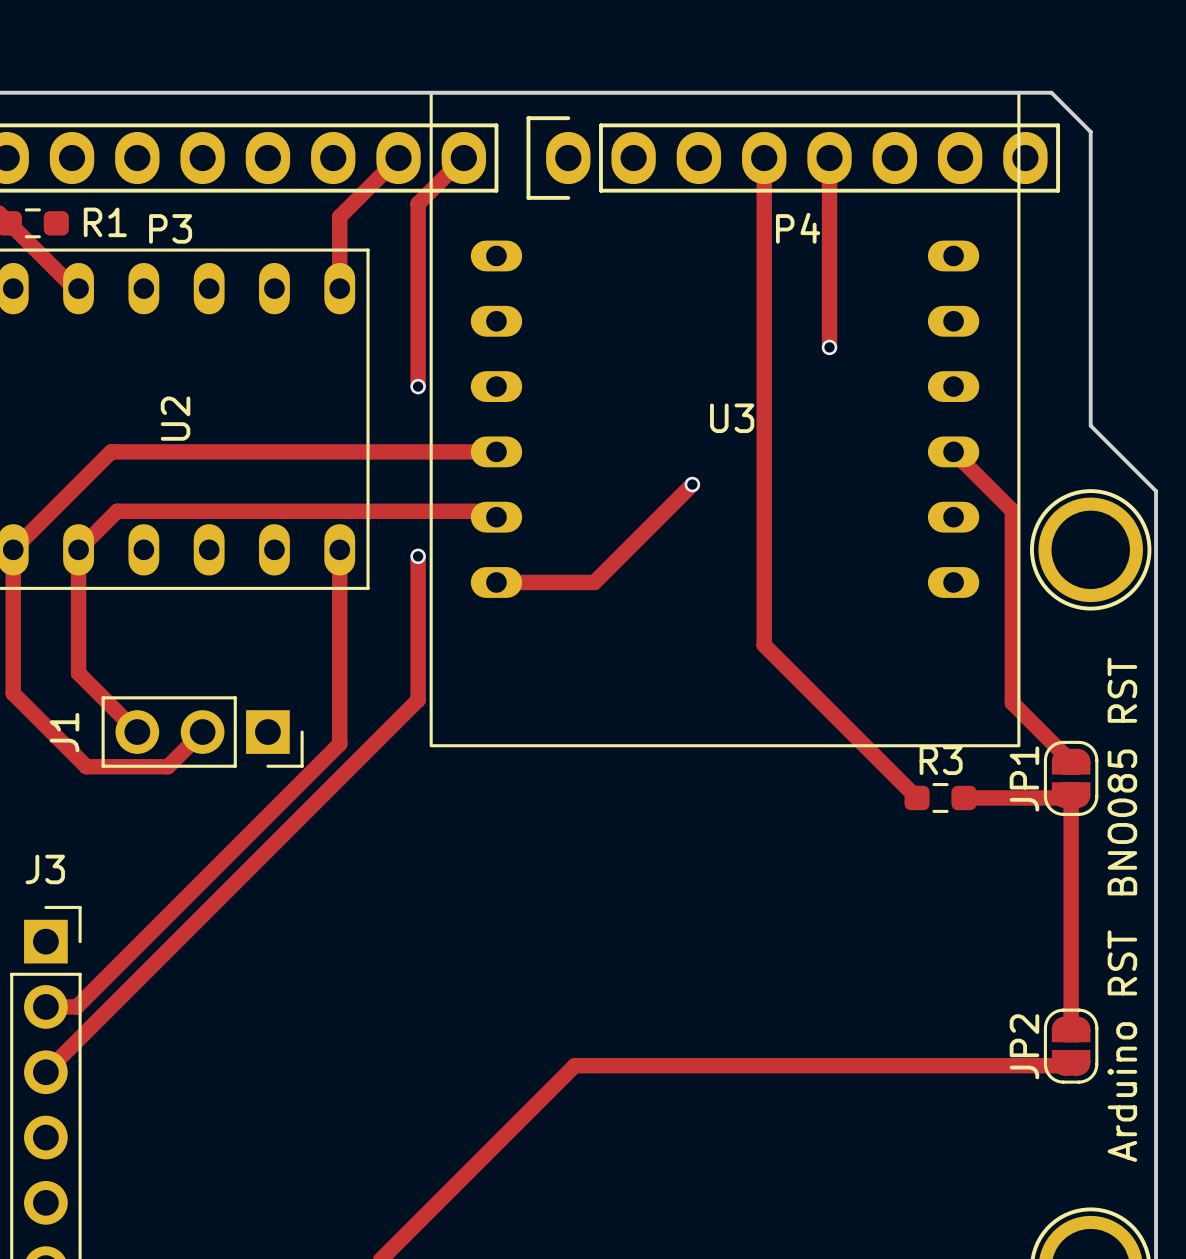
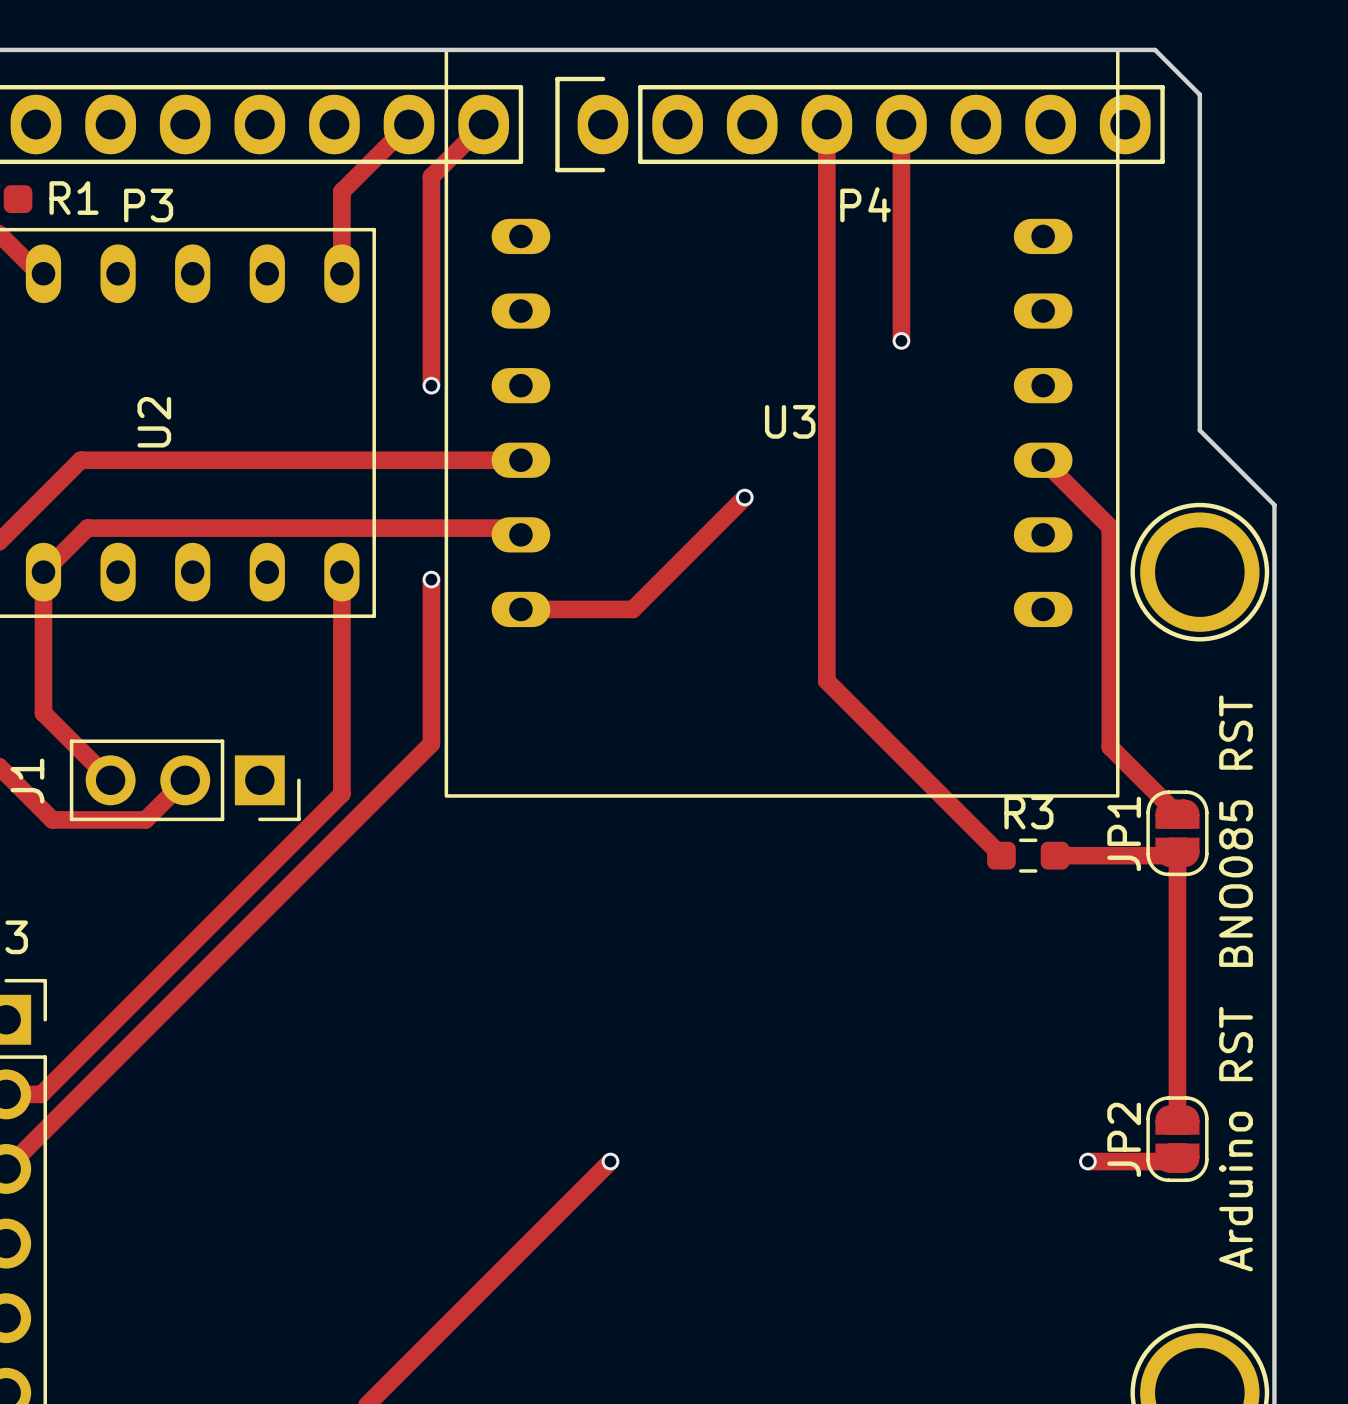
track: (574, 1065) (992, 1065) -> none
via: none -> (610, 1161)
via: none -> (1087, 1161)

